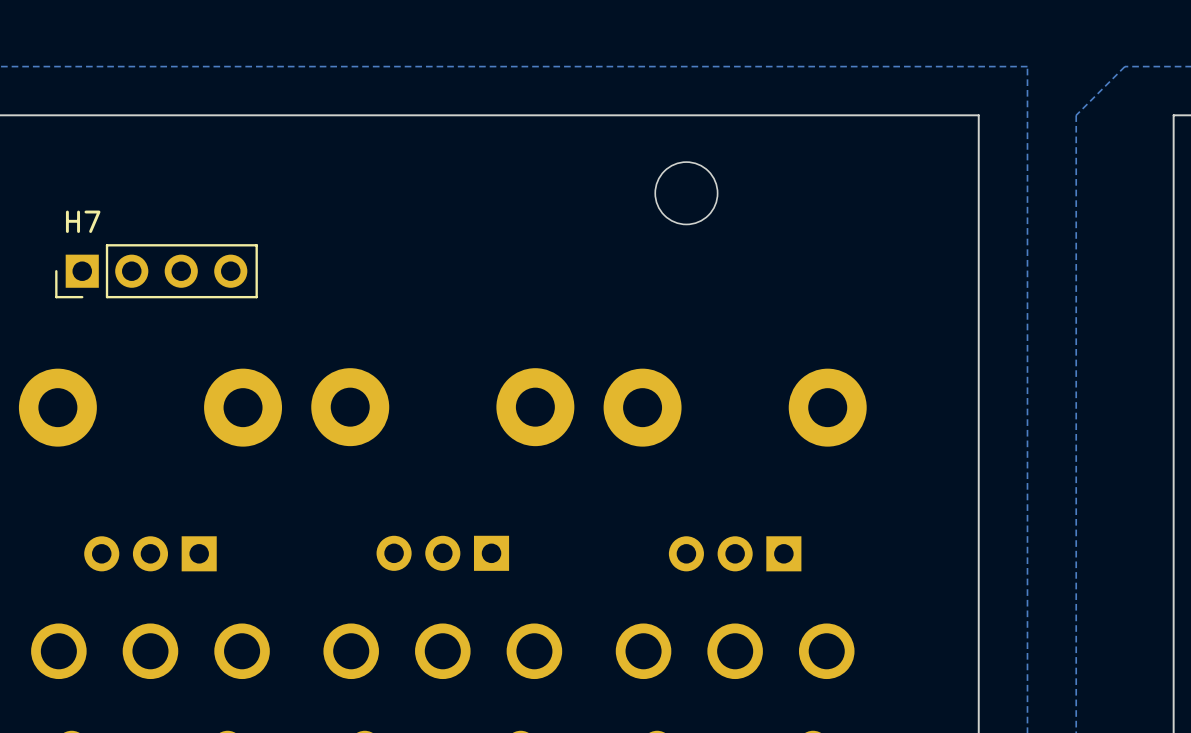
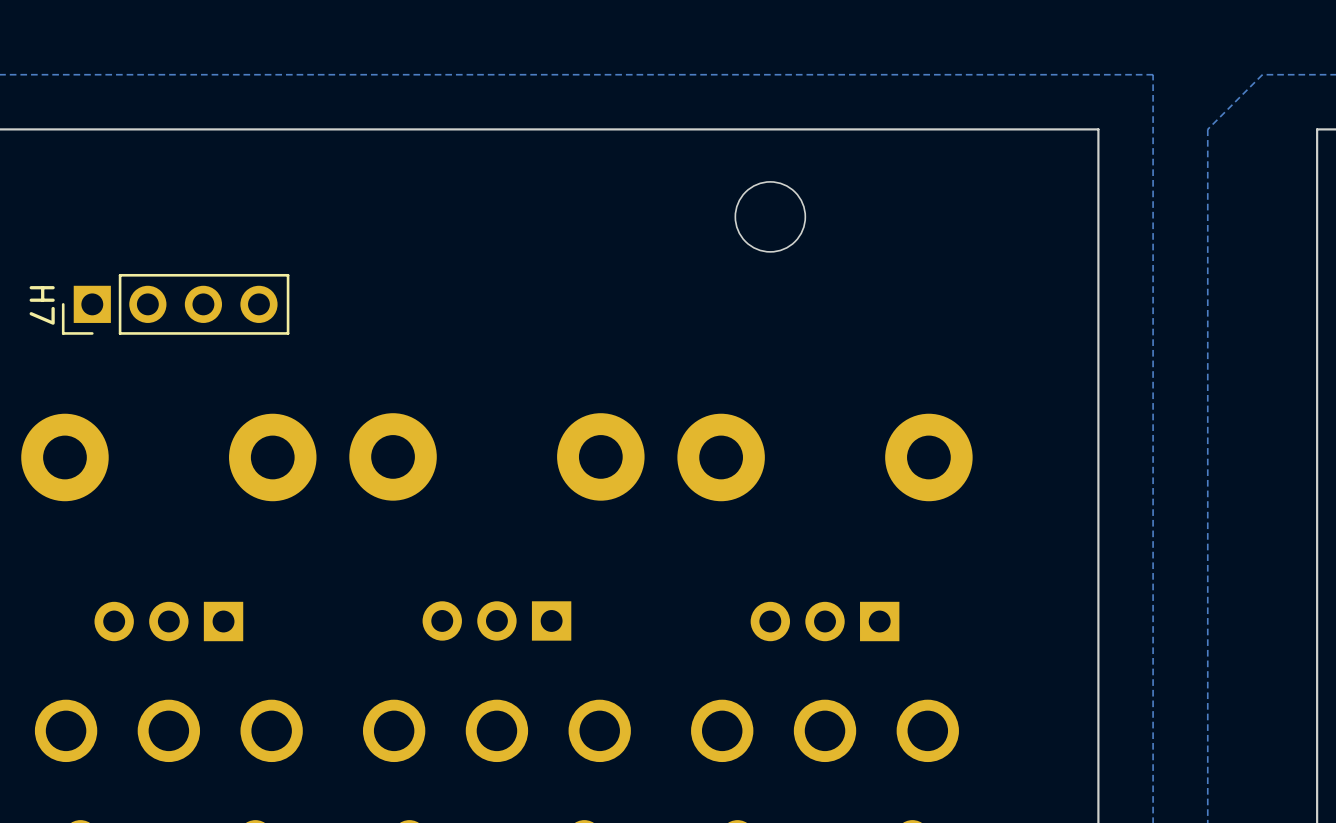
H7 name rotation: 0° (83, 221) -> 90° clockwise (42, 305)
H7 name position: H7 (83, 221) -> H7 (42, 305)

